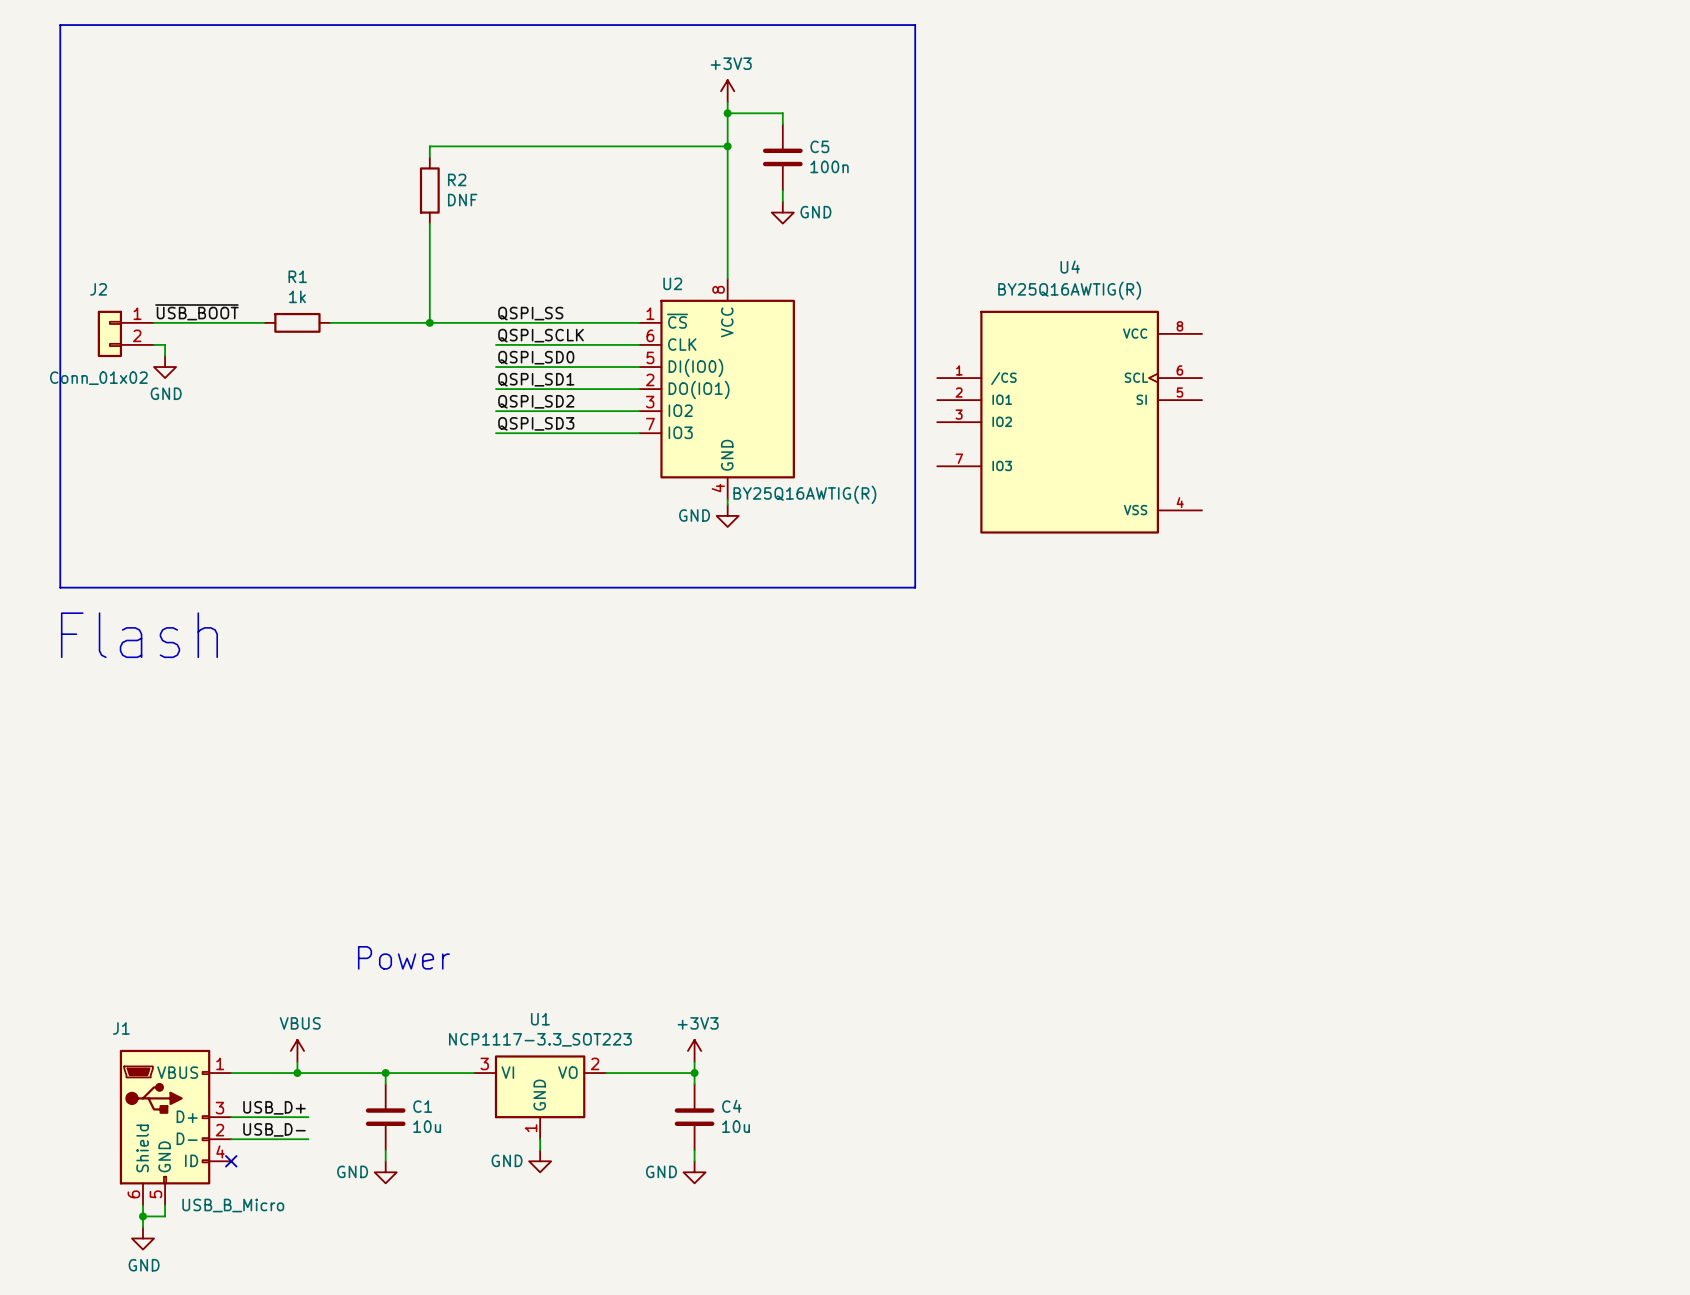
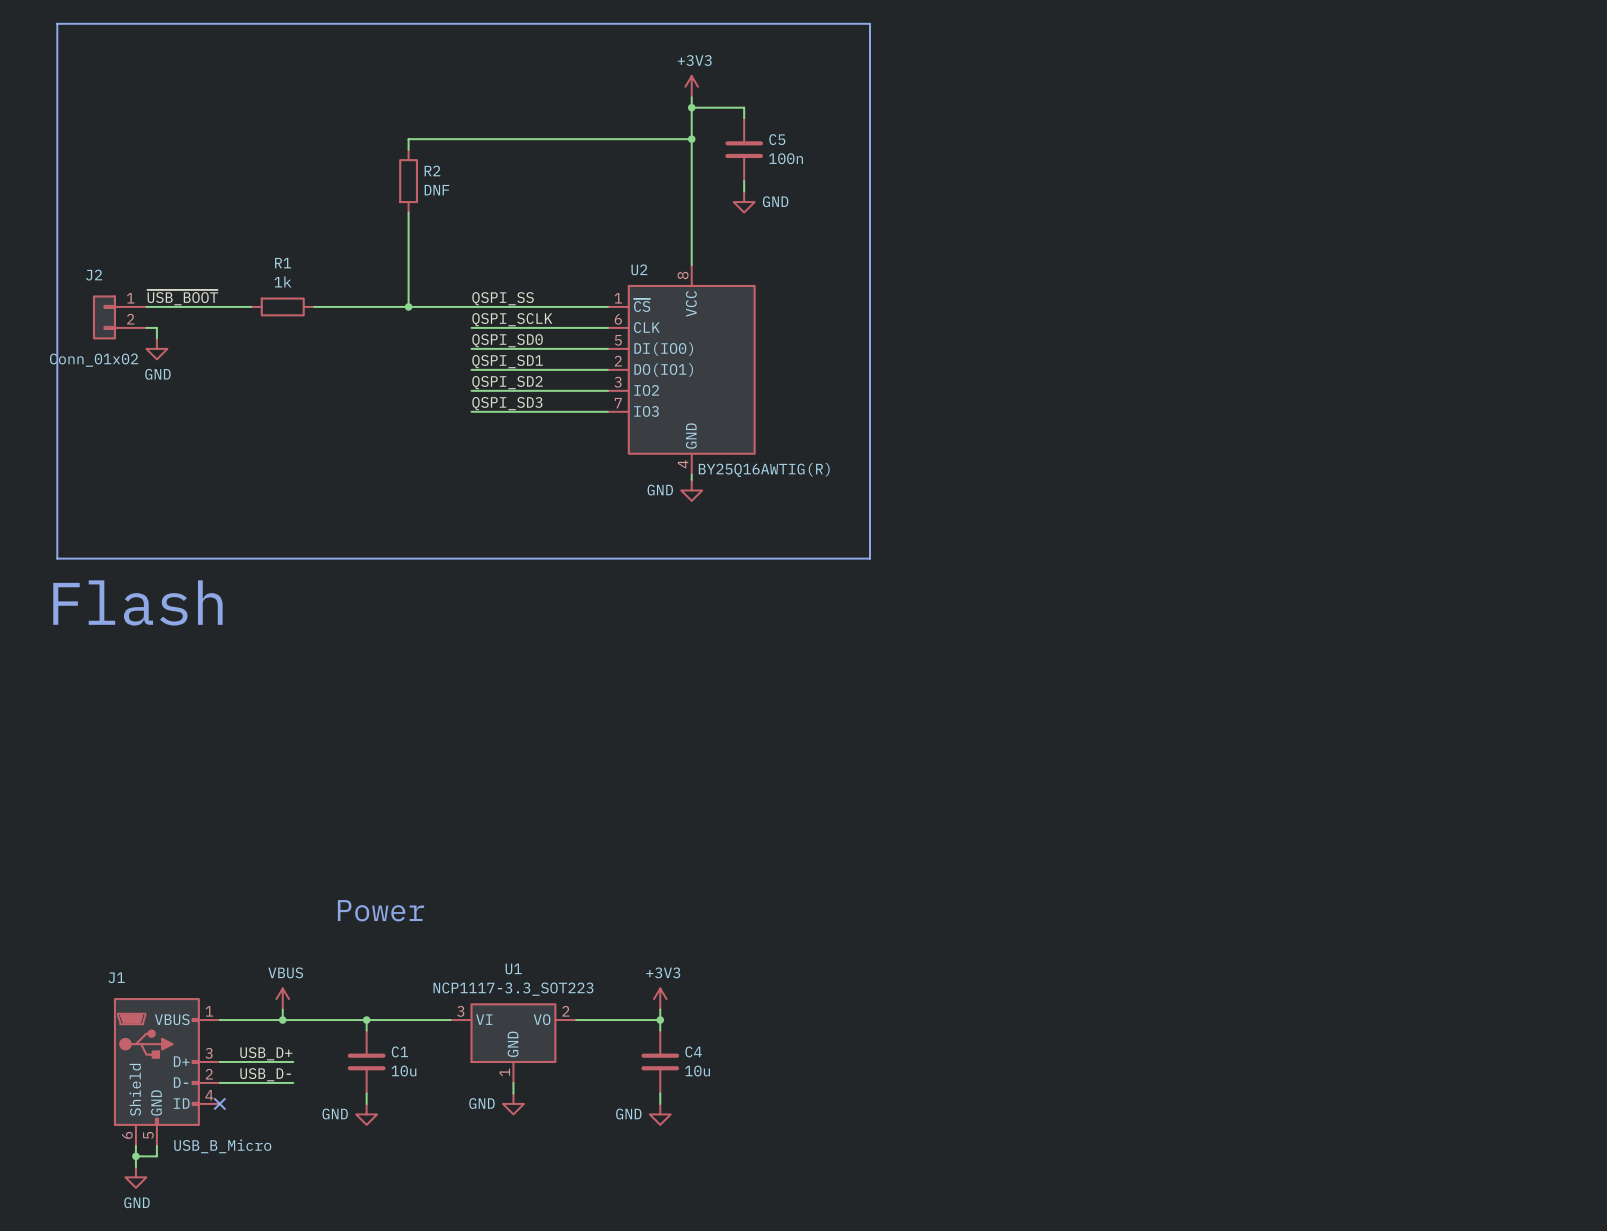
U4: BY25Q16AWTIG(R) (1069, 422) -> none

